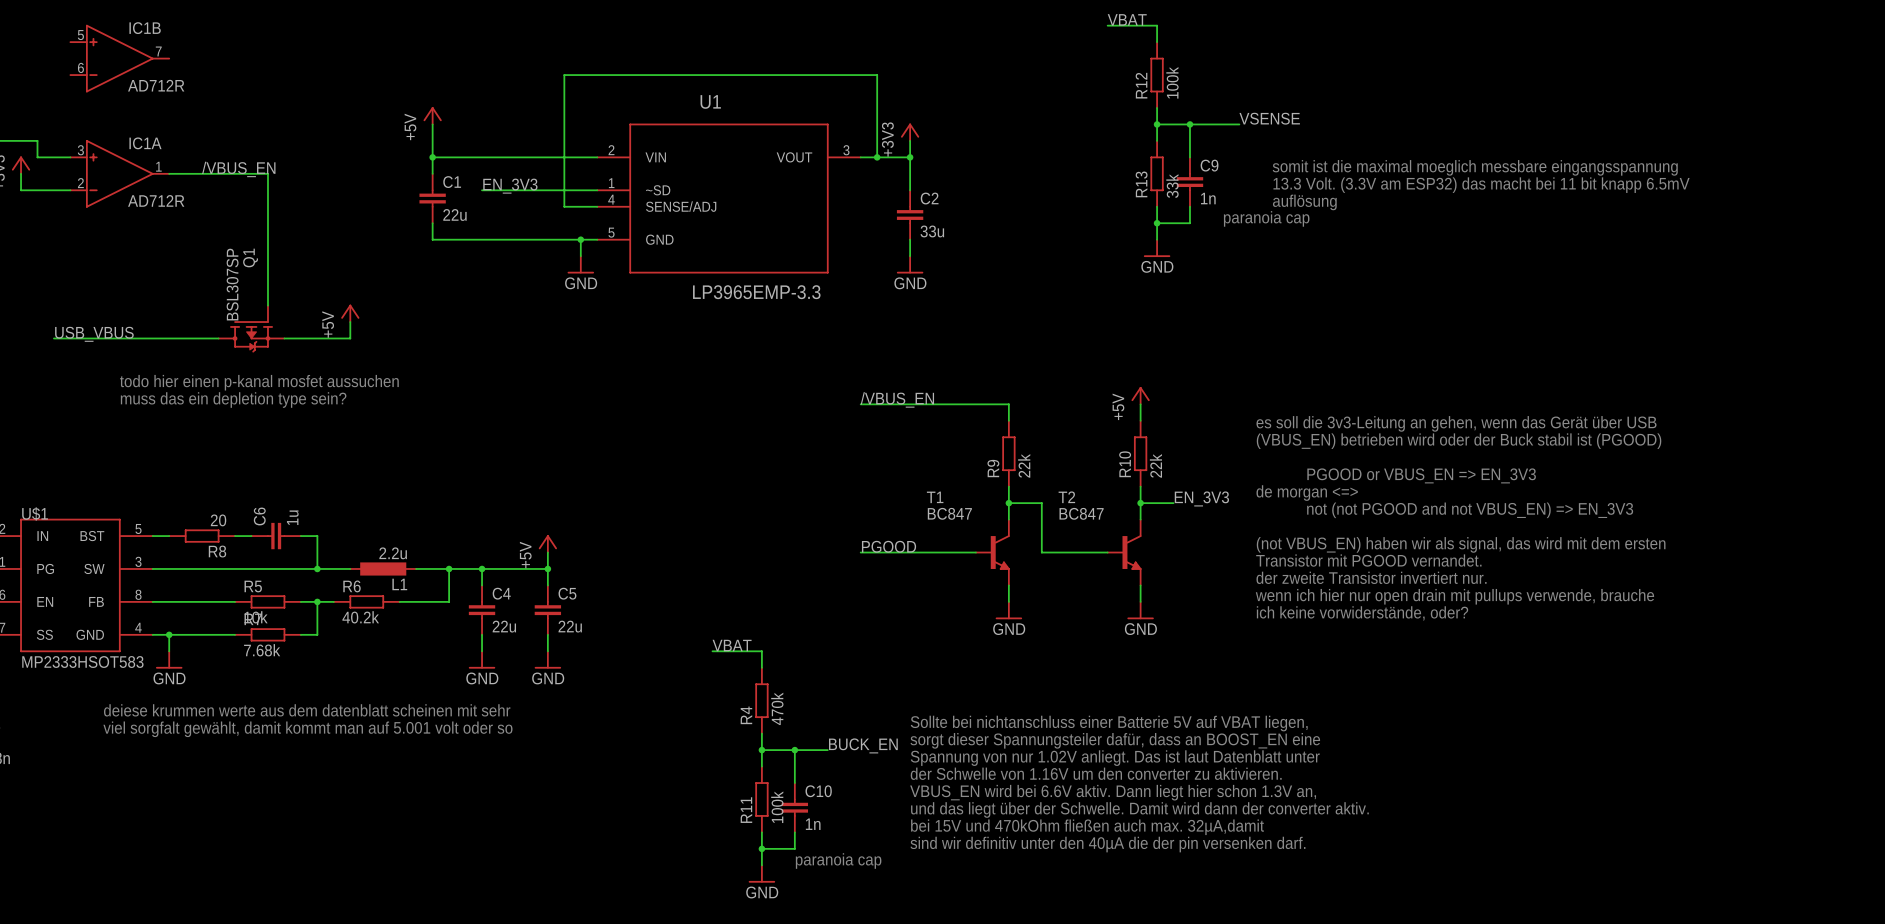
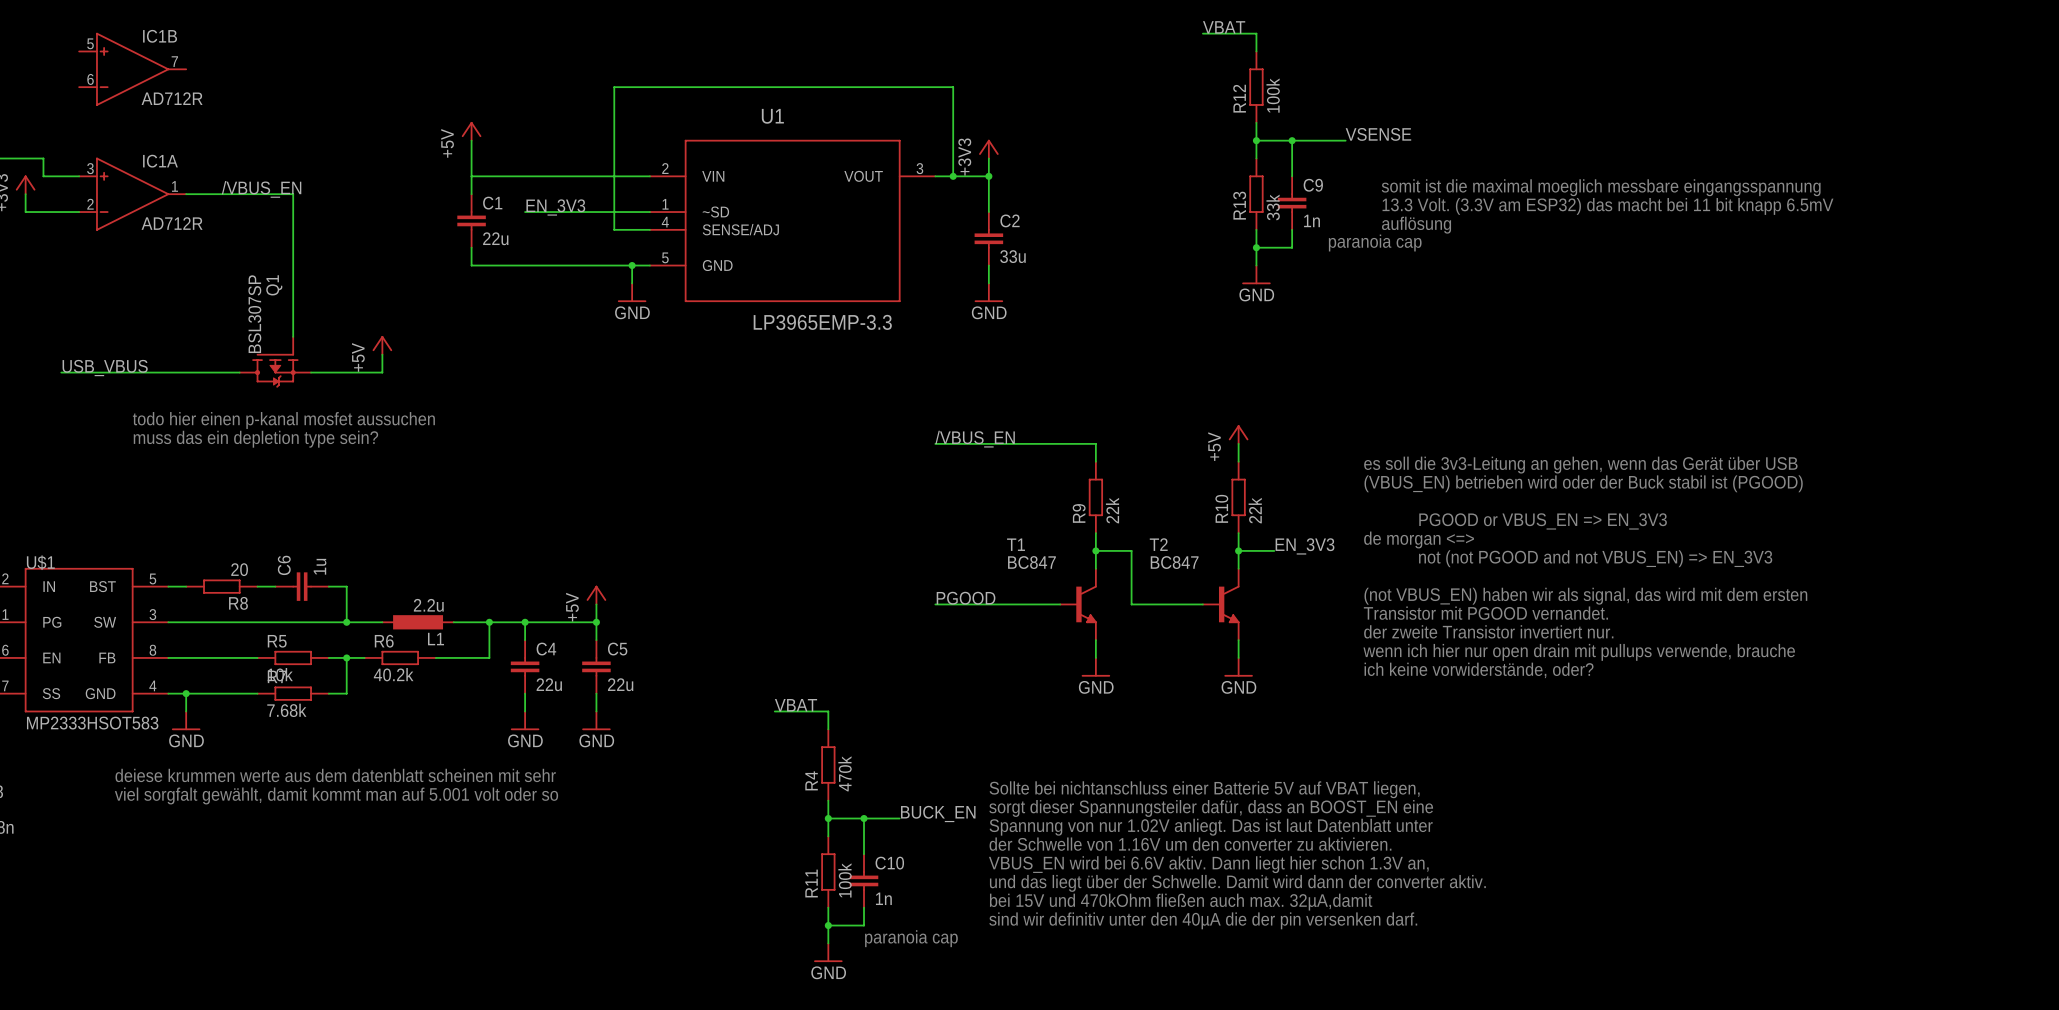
junction: (432, 157) -> none

